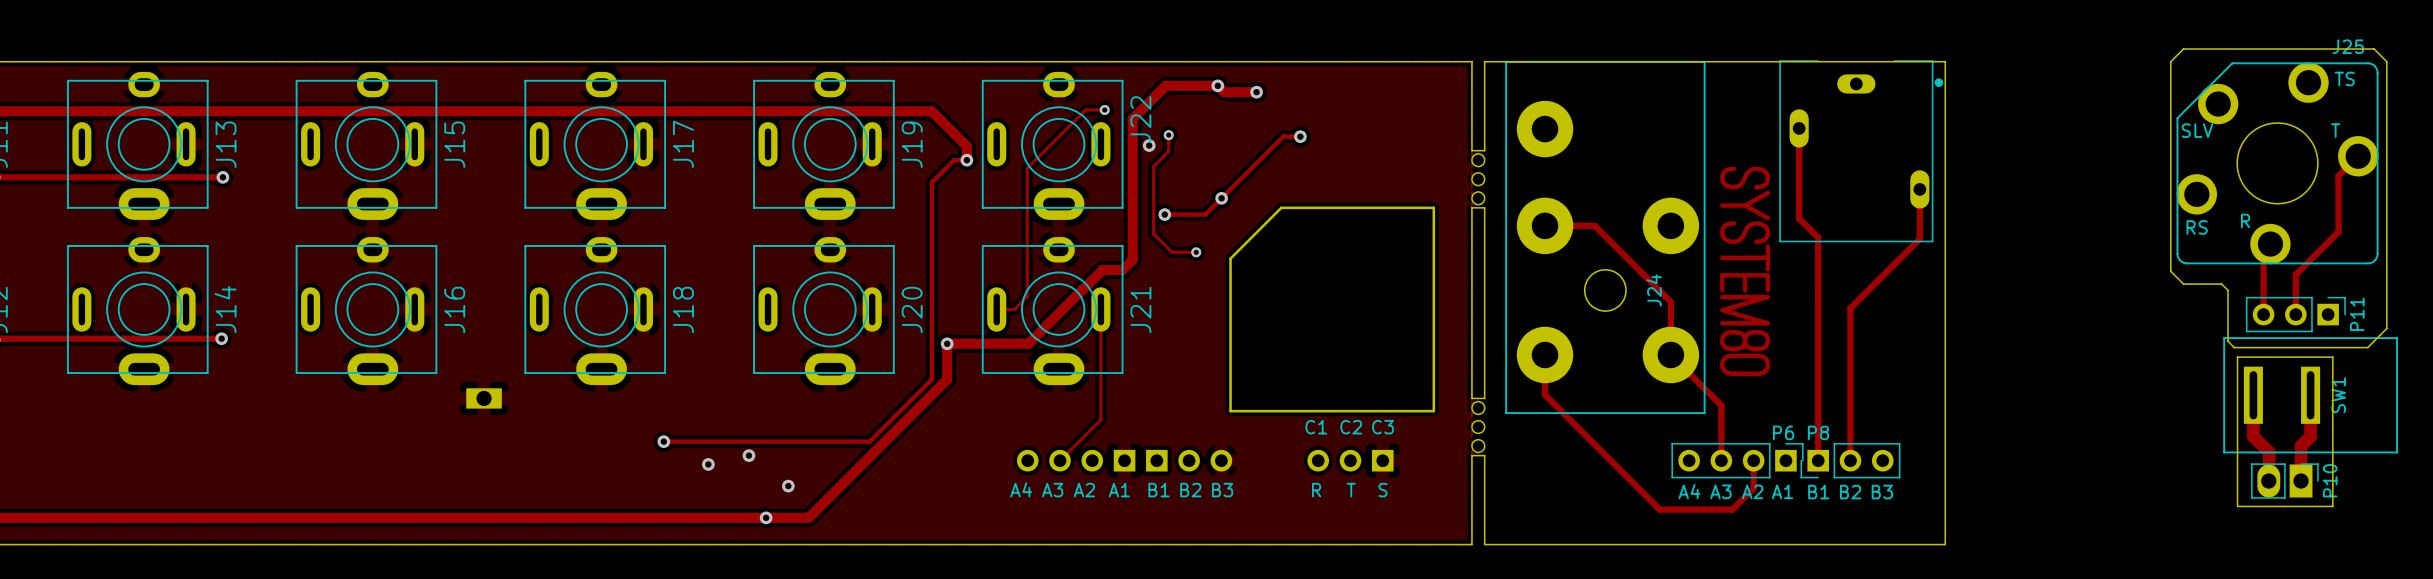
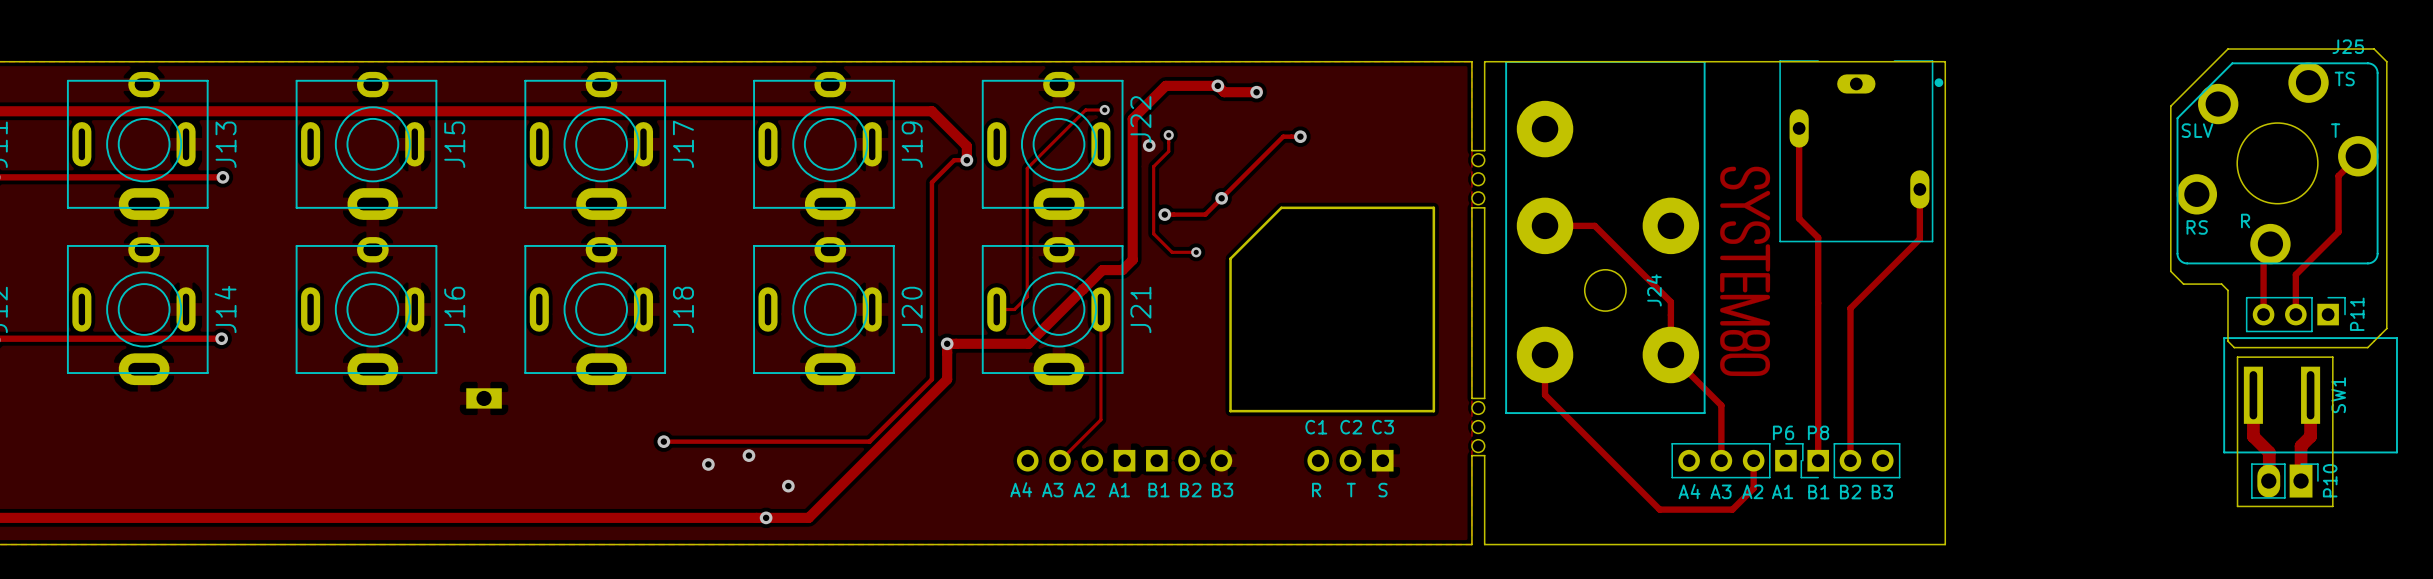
board edge: (2227, 49) (2183, 49) (2170, 61) (2170, 106) -> (2227, 49) (2170, 106)

